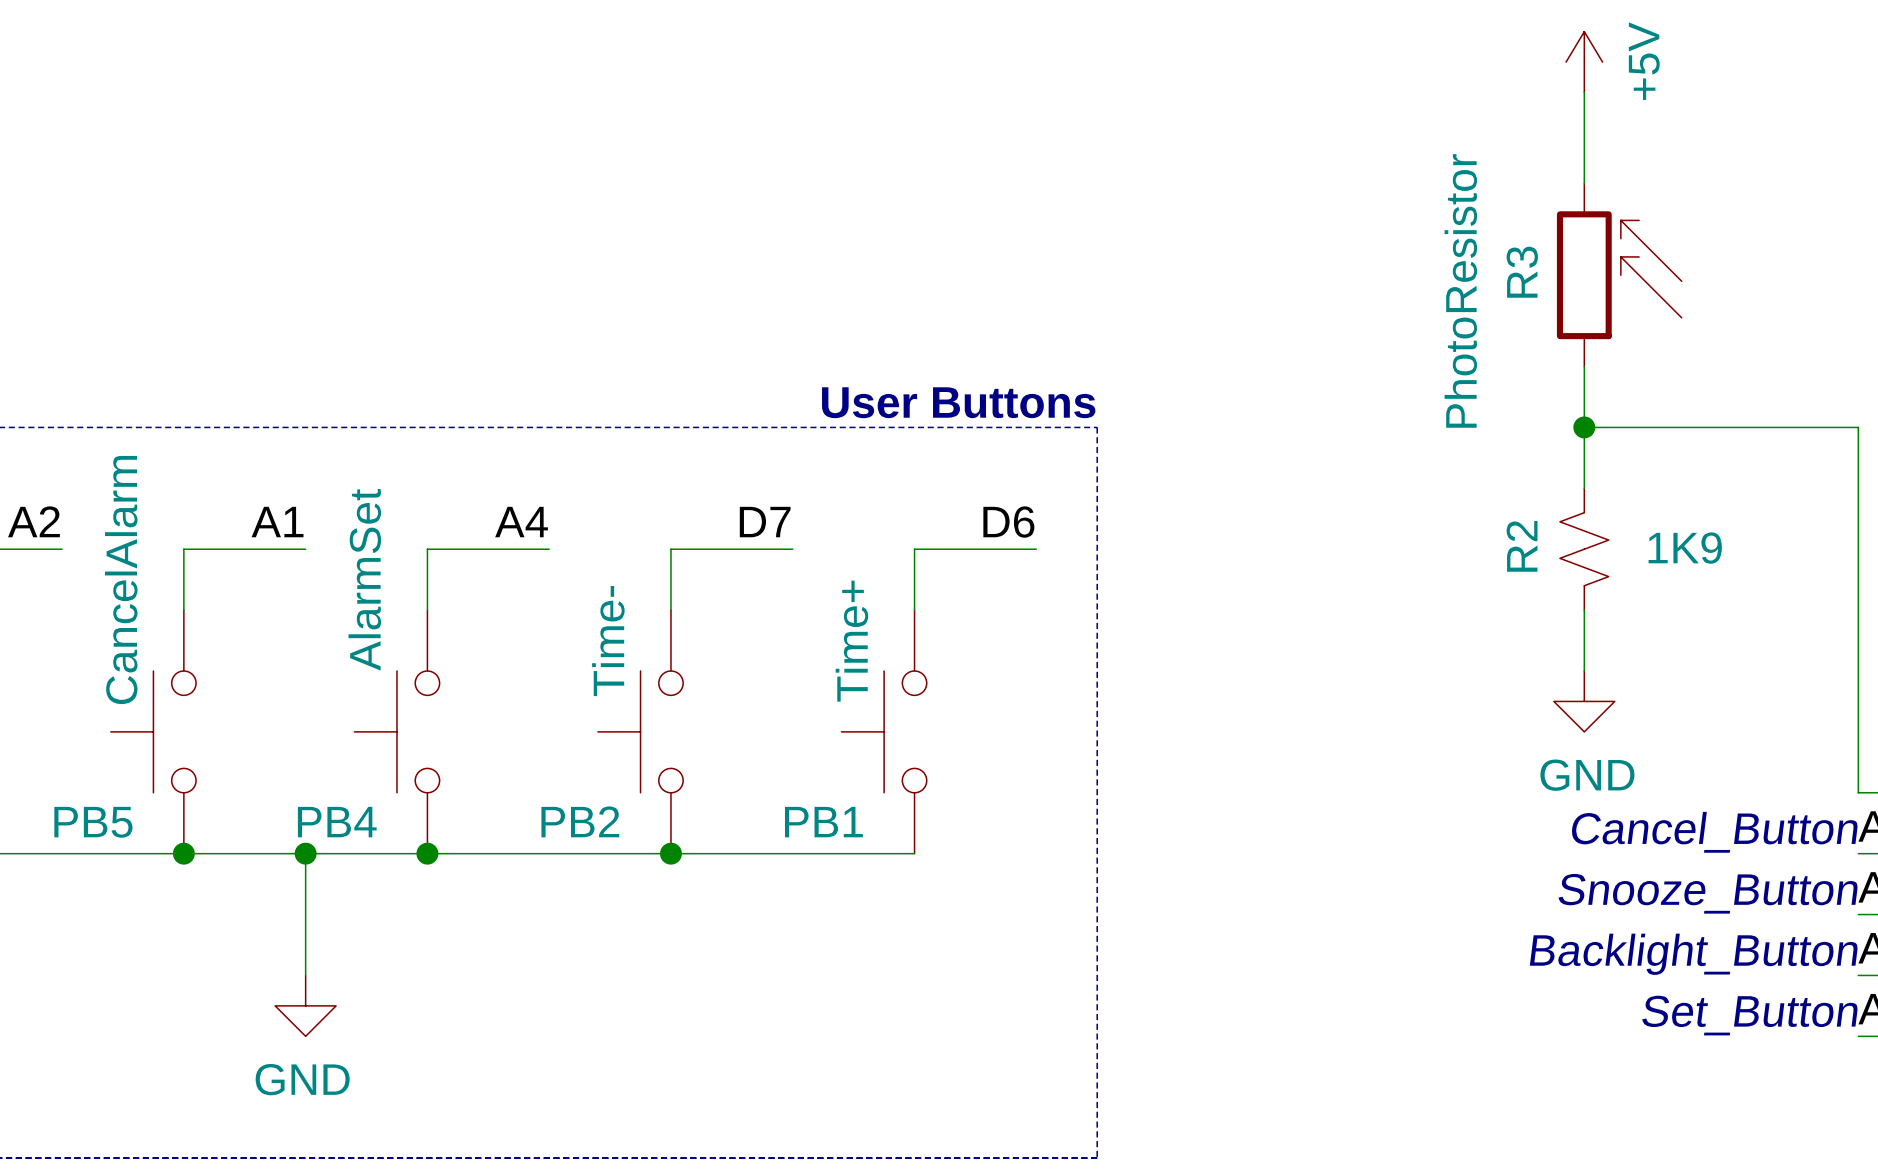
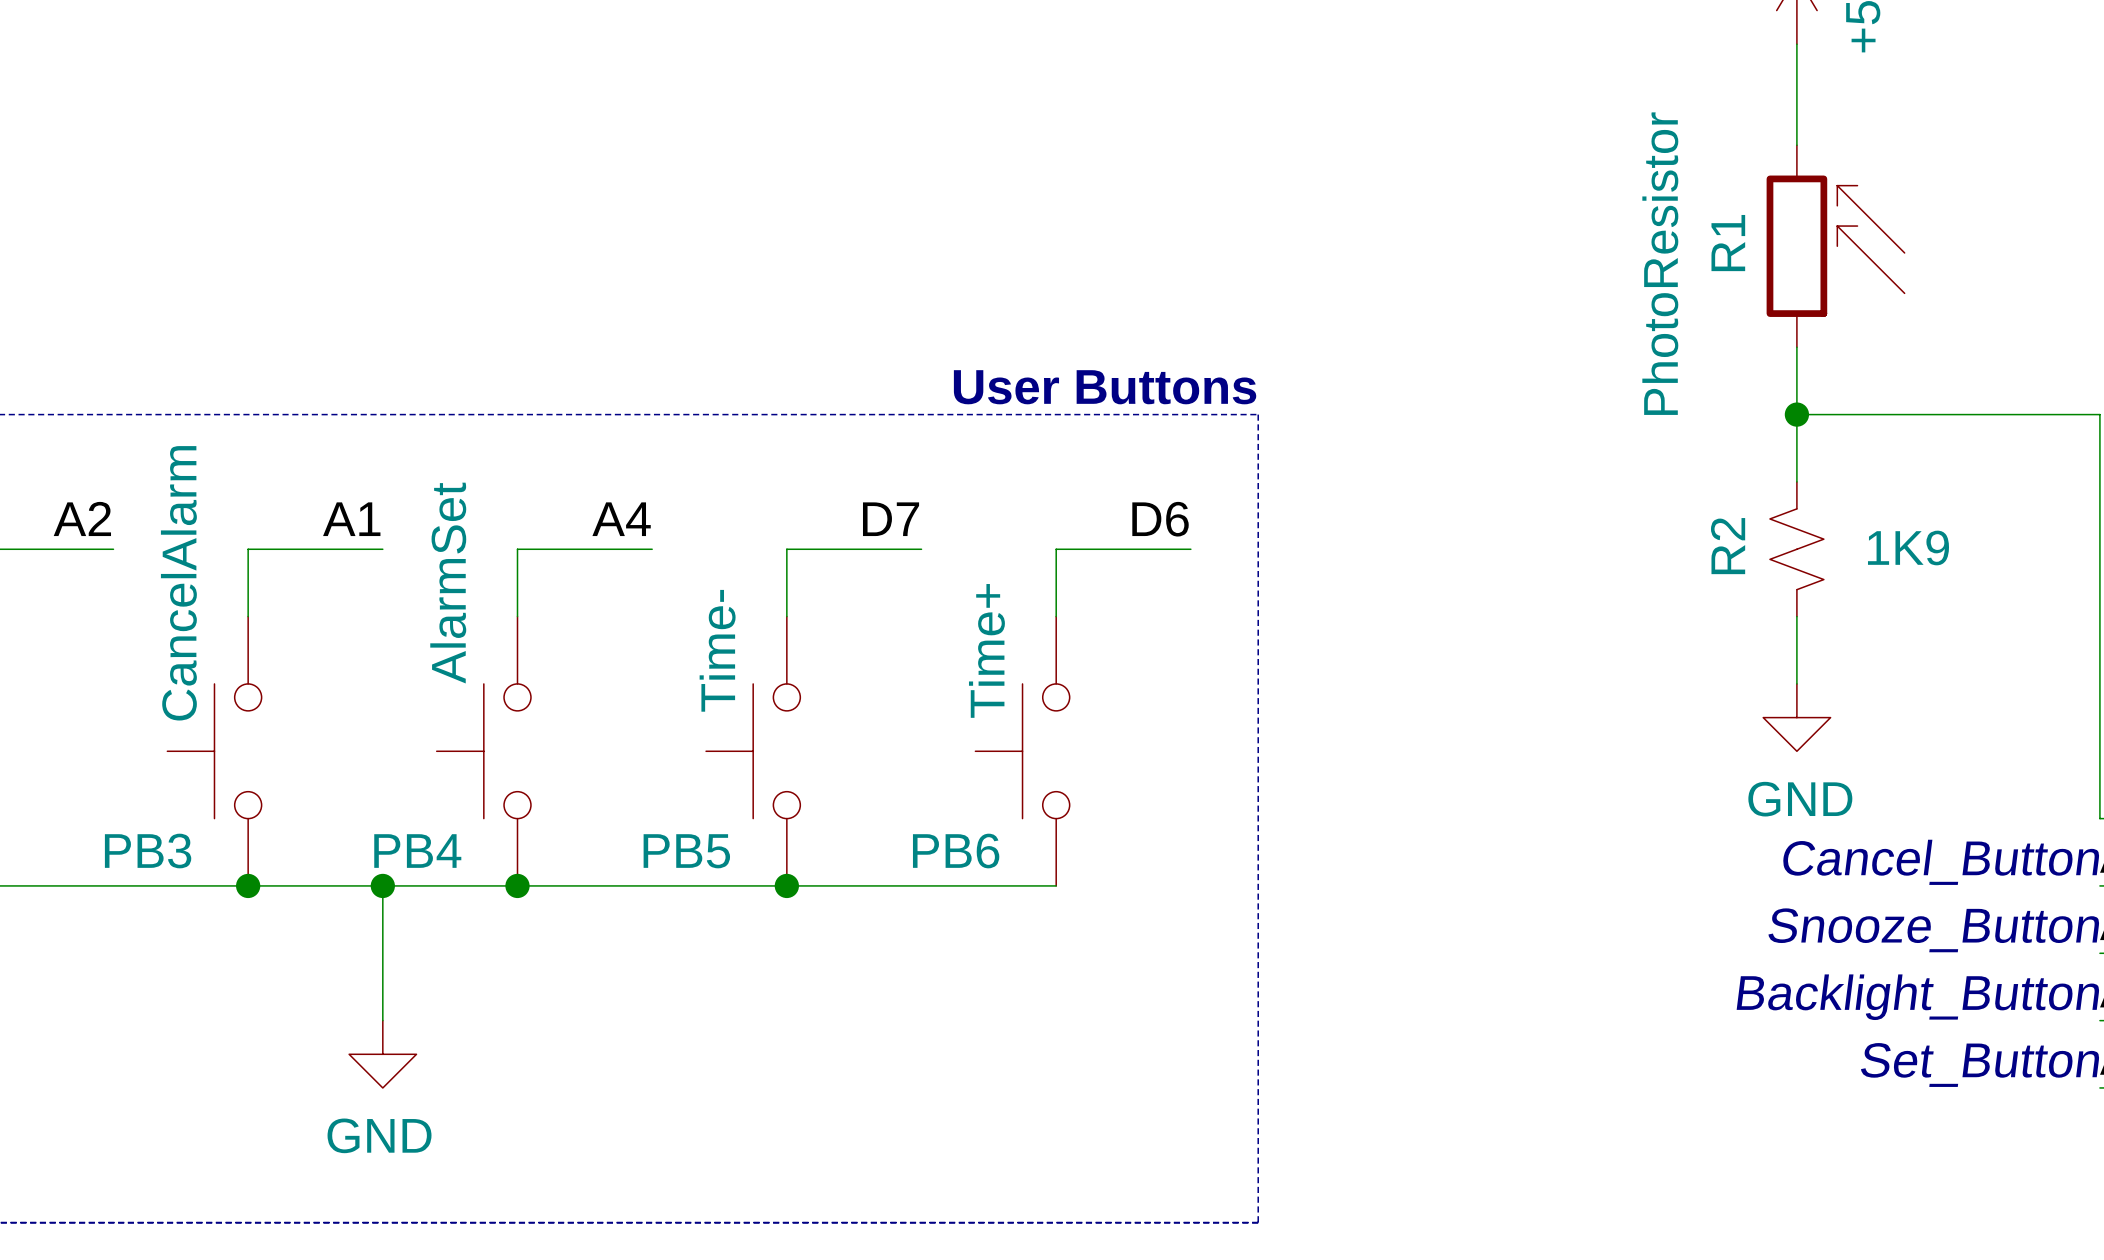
R3 name: R3 (1522, 272) -> R1 (1728, 243)
PB2 name: PB2 (580, 821) -> PB5 (686, 851)
PB5 name: PB5 (93, 822) -> PB3 (148, 851)
PB1 name: PB1 (823, 822) -> PB6 (956, 851)

